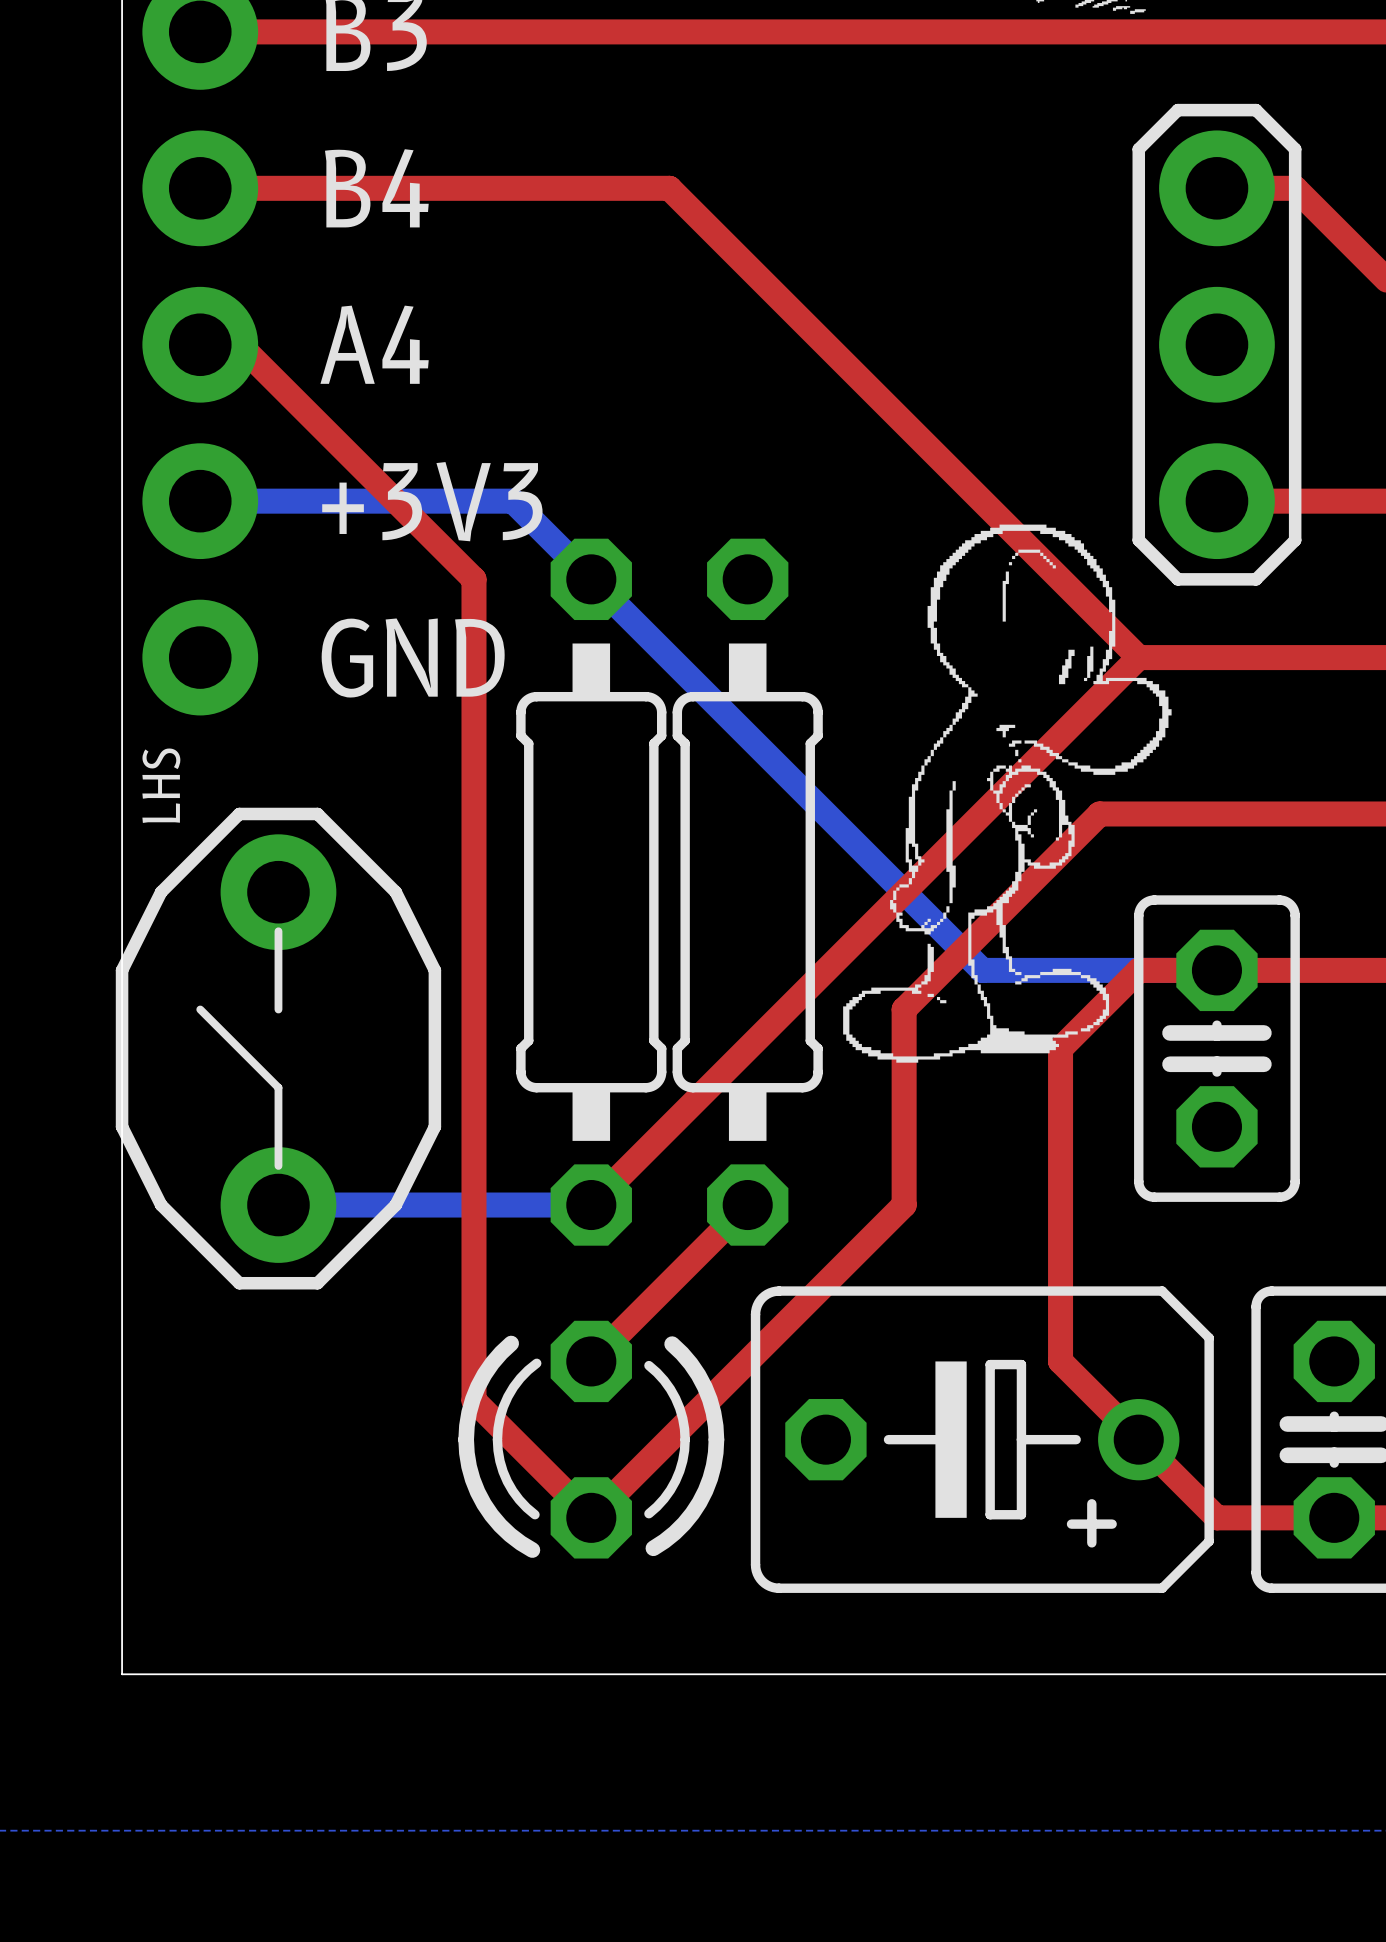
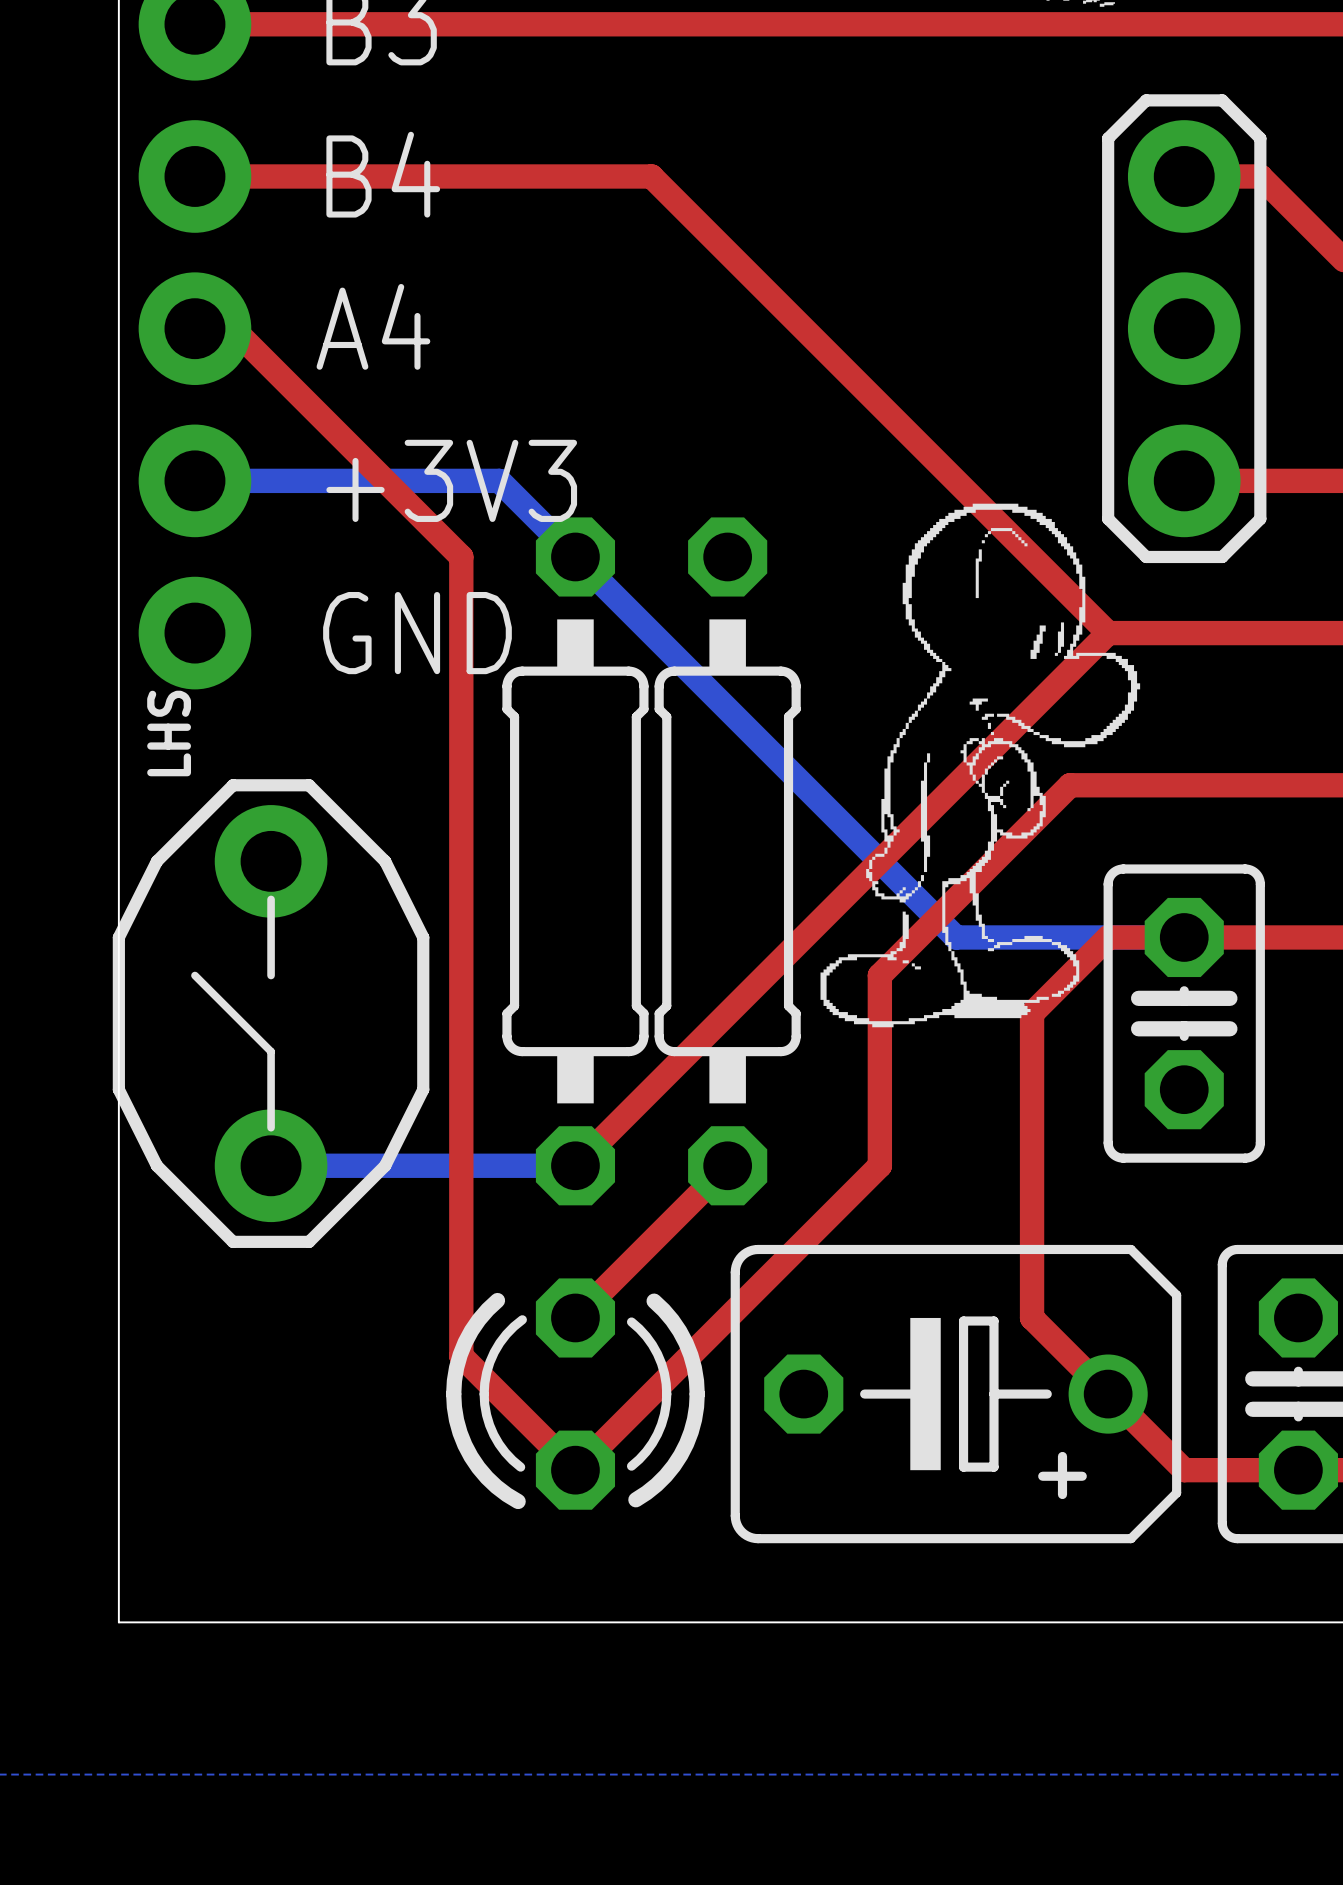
LHS name position: LHS (161, 785) -> LHS (169, 733)

